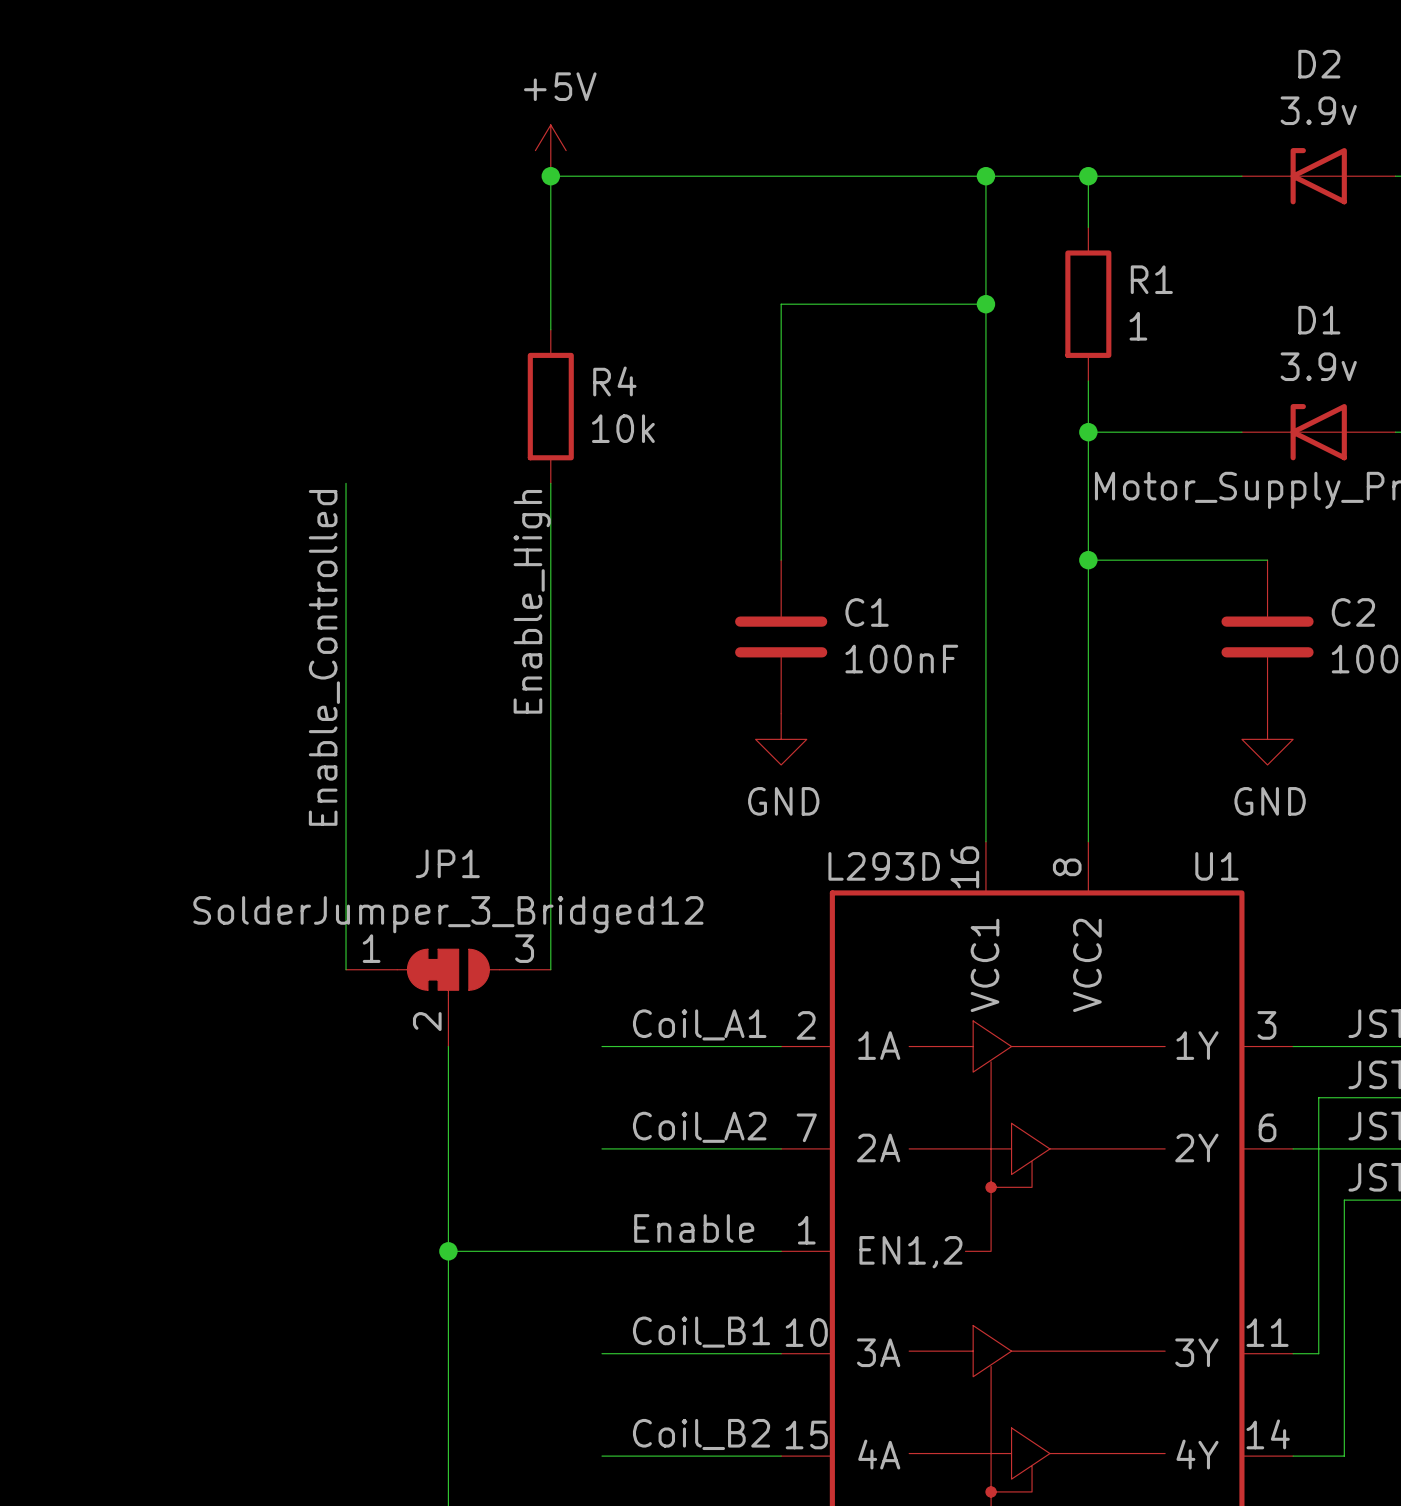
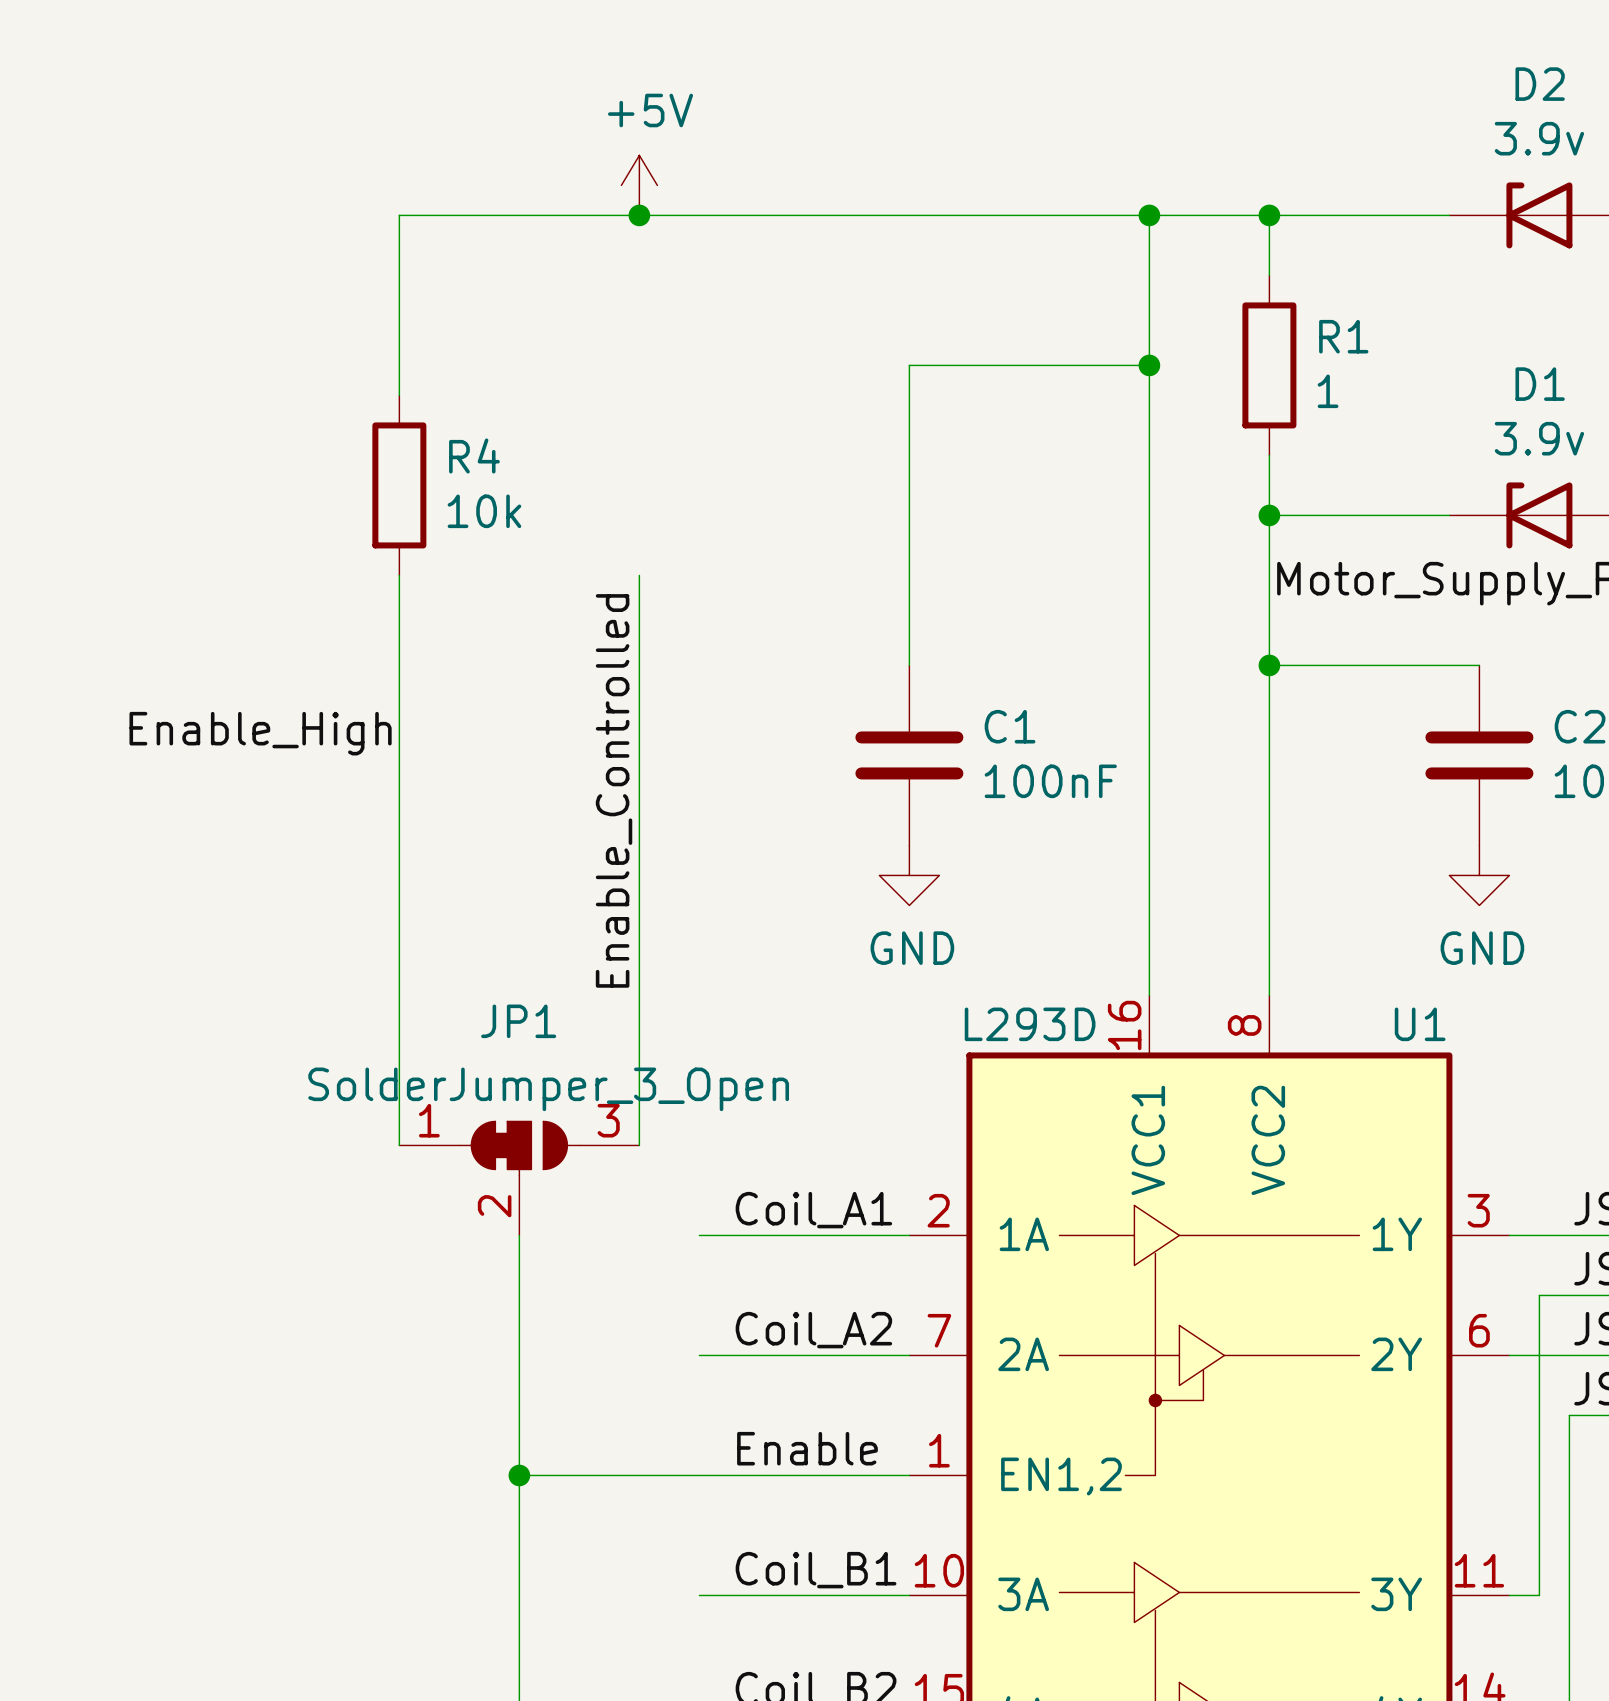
wire: (550, 176) (550, 329) -> (639, 215) (399, 215) (399, 395)
R4 position: (550, 406) -> (399, 485)
label rotation: 0° (532, 601) -> 90° clockwise (260, 733)
label position: Enable_High (532, 601) -> Enable_High (260, 733)
label position: Enable_Controlled (324, 657) -> Enable_Controlled (614, 790)
JP1 value: SolderJumper_3_Bridged12 (448, 914) -> SolderJumper_3_Open (548, 1089)

